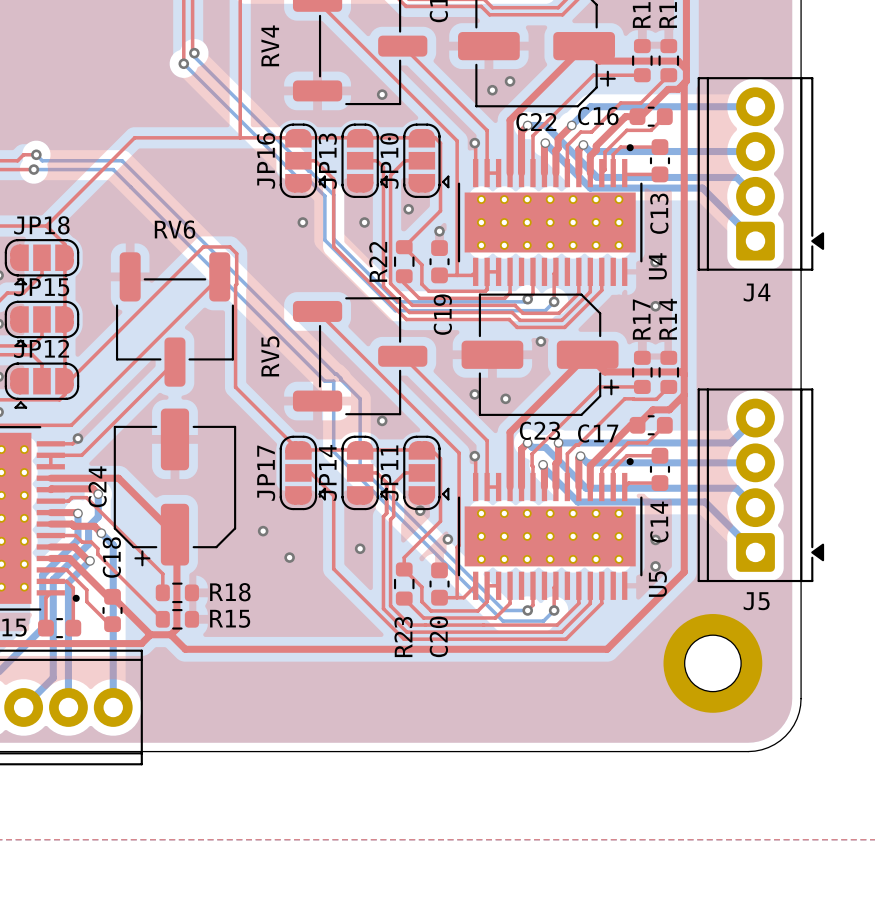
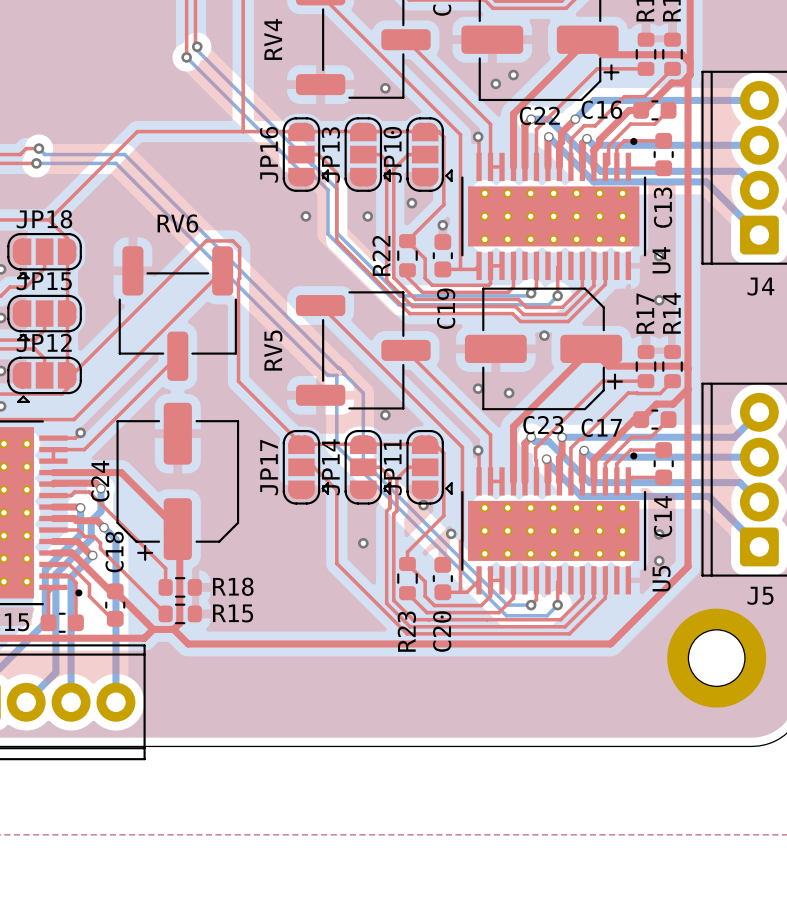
via: (263, 531) -> none
via: (289, 557) -> none

